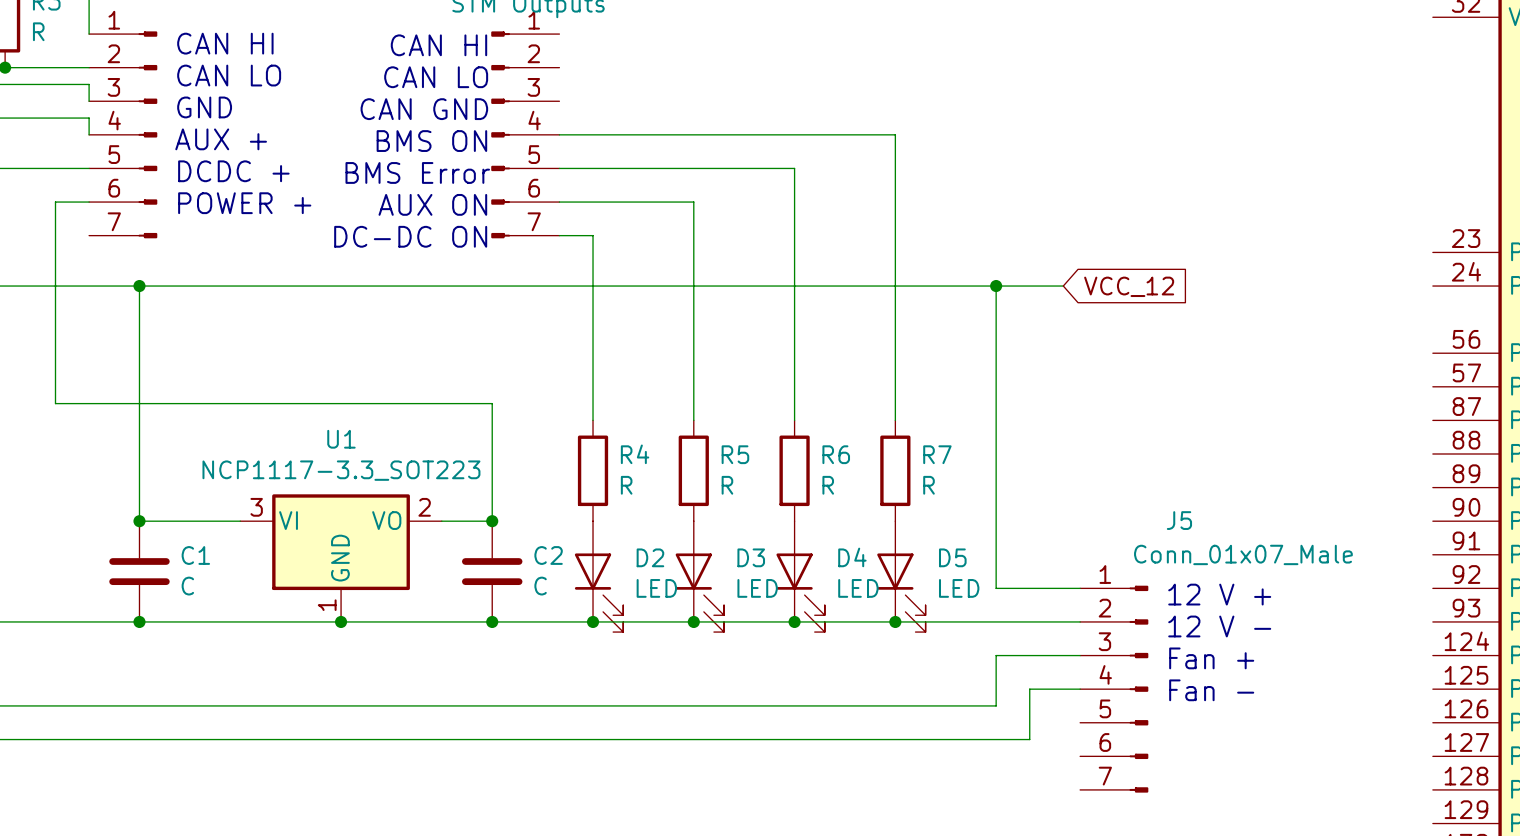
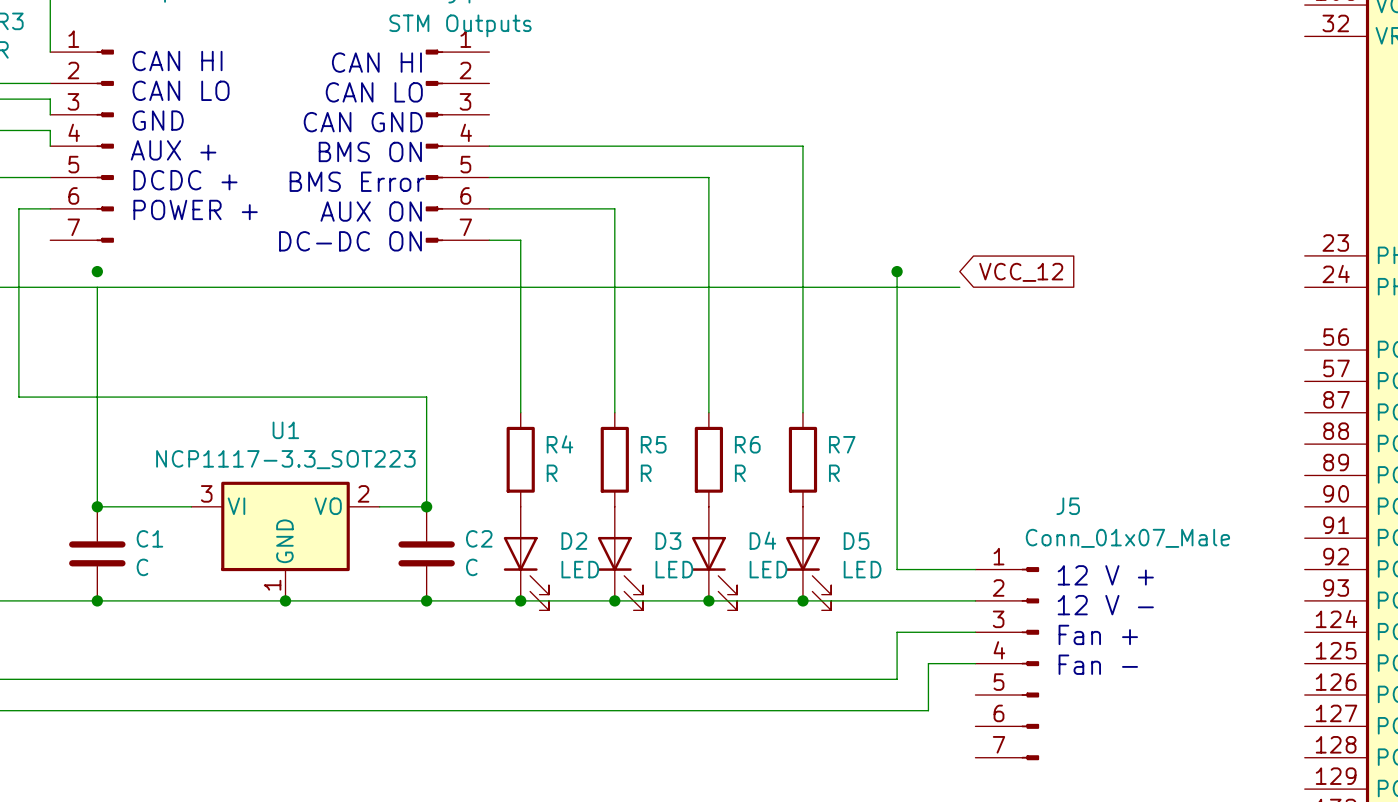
wire: none -> (897, 271) (897, 287)
junction position: (139, 286) -> (97, 271)
junction position: (996, 286) -> (897, 271)
global label position: VCC_12 (1129, 286) -> VCC_12 (1021, 272)

